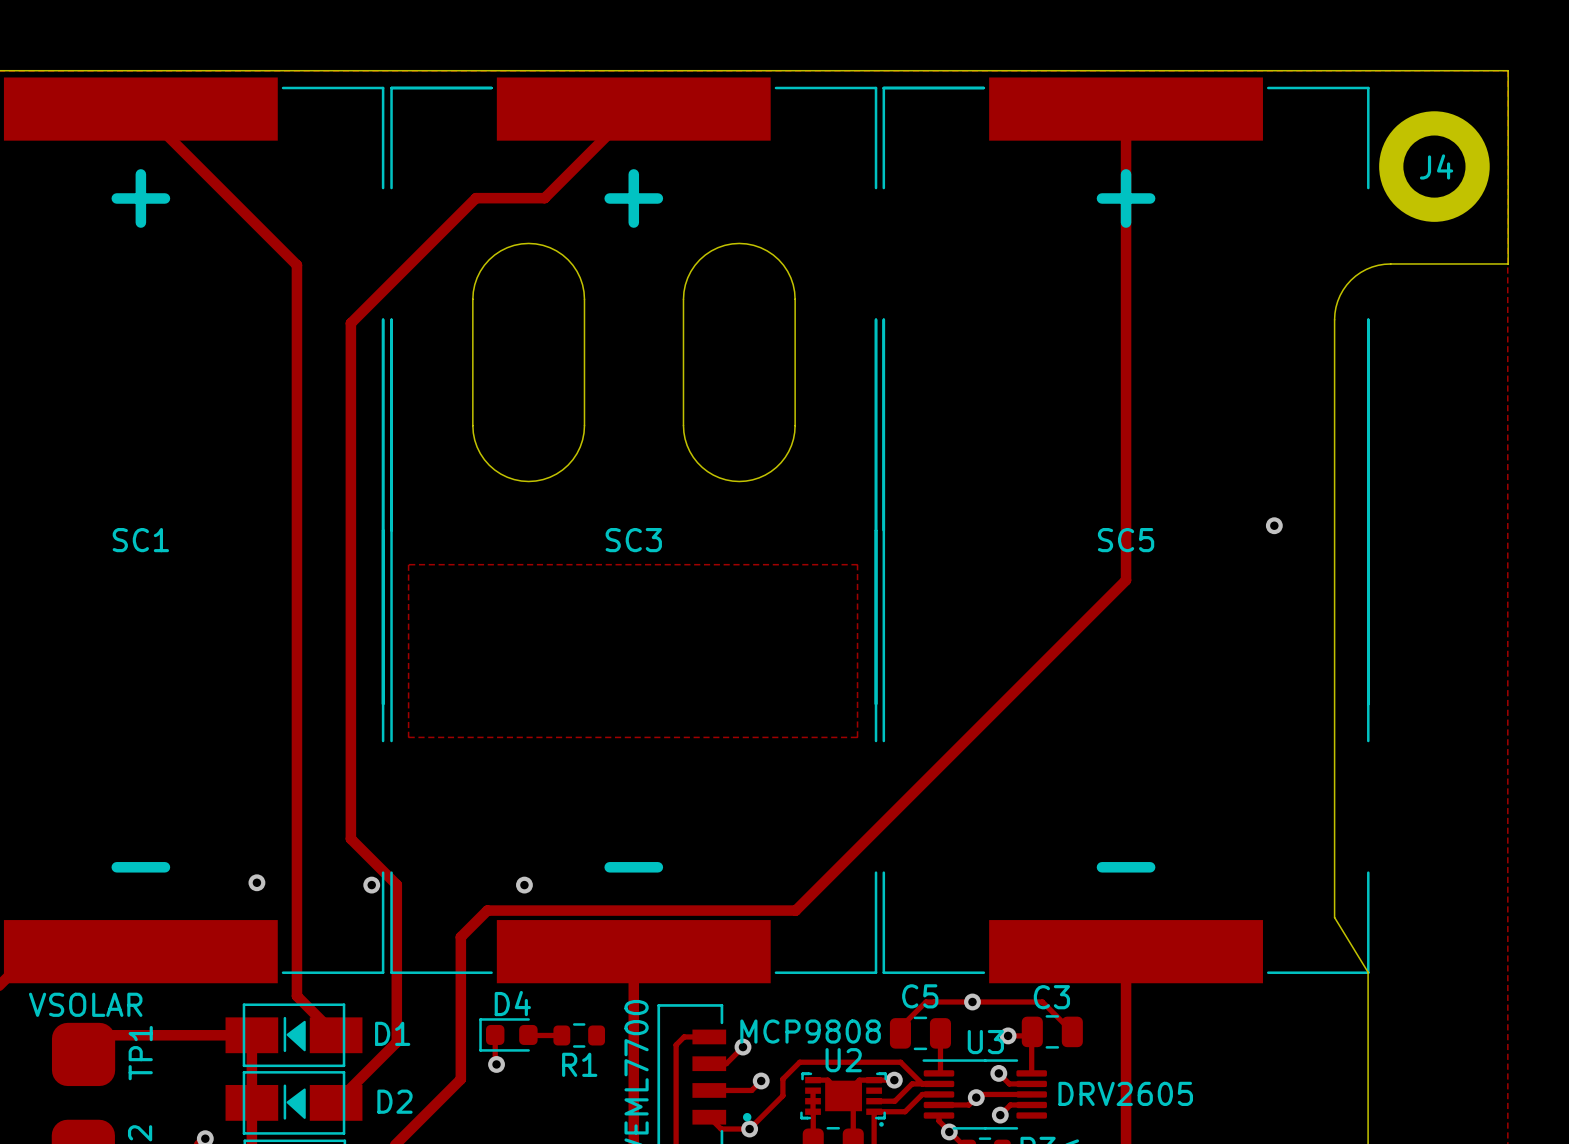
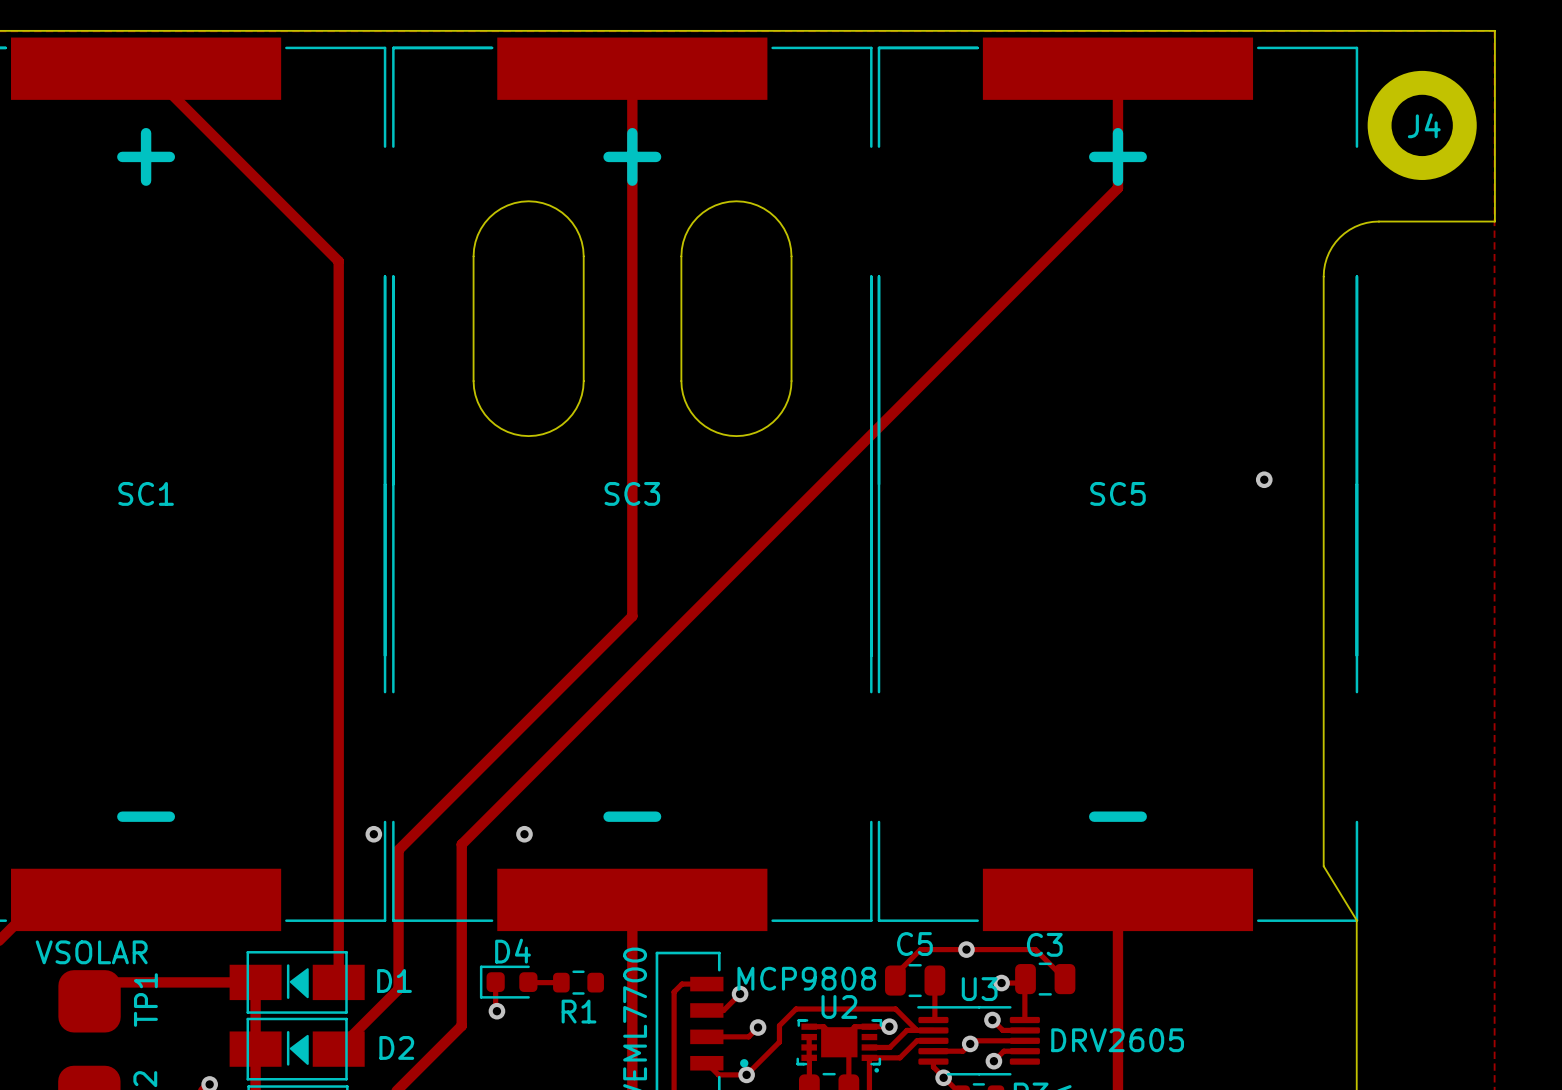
track: (633, 109) (544, 198) (476, 198) (350, 323) (350, 838) (396, 884) (396, 901) -> (632, 68) (632, 616) (398, 850)
track: (1126, 230) (1126, 580) (795, 910) (487, 910) (460, 937) -> (1117, 188) (461, 844) (461, 885)
track: (296, 265) (296, 996) (336, 1035) -> (300, 222) (338, 261) (338, 982)
zone outline: (408, 564) (408, 737) (857, 737) (857, 564) (408, 564) -> none
via: (256, 882) -> none

